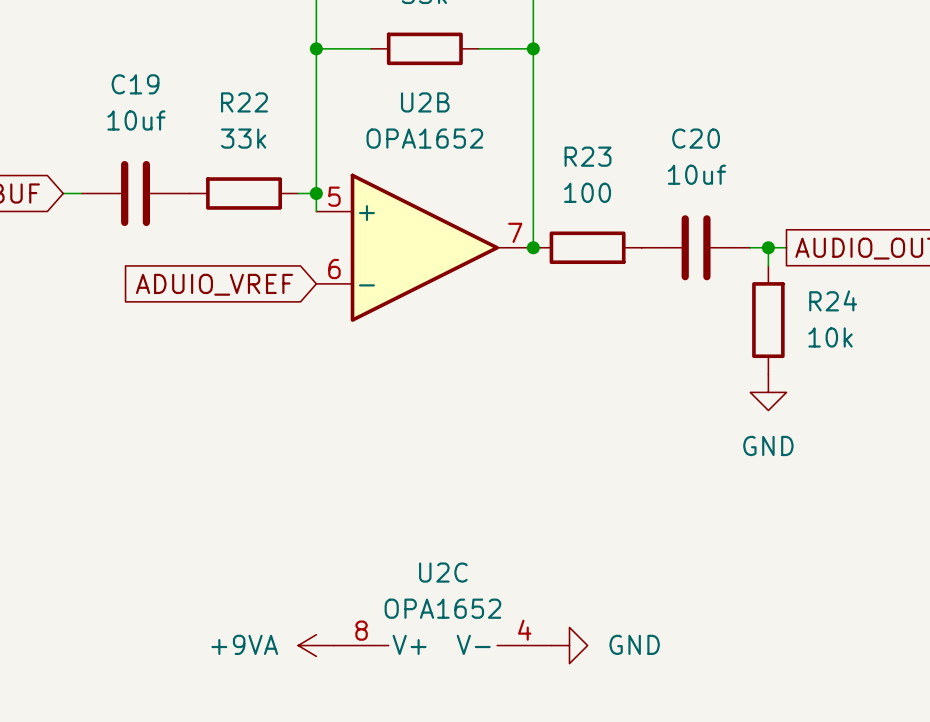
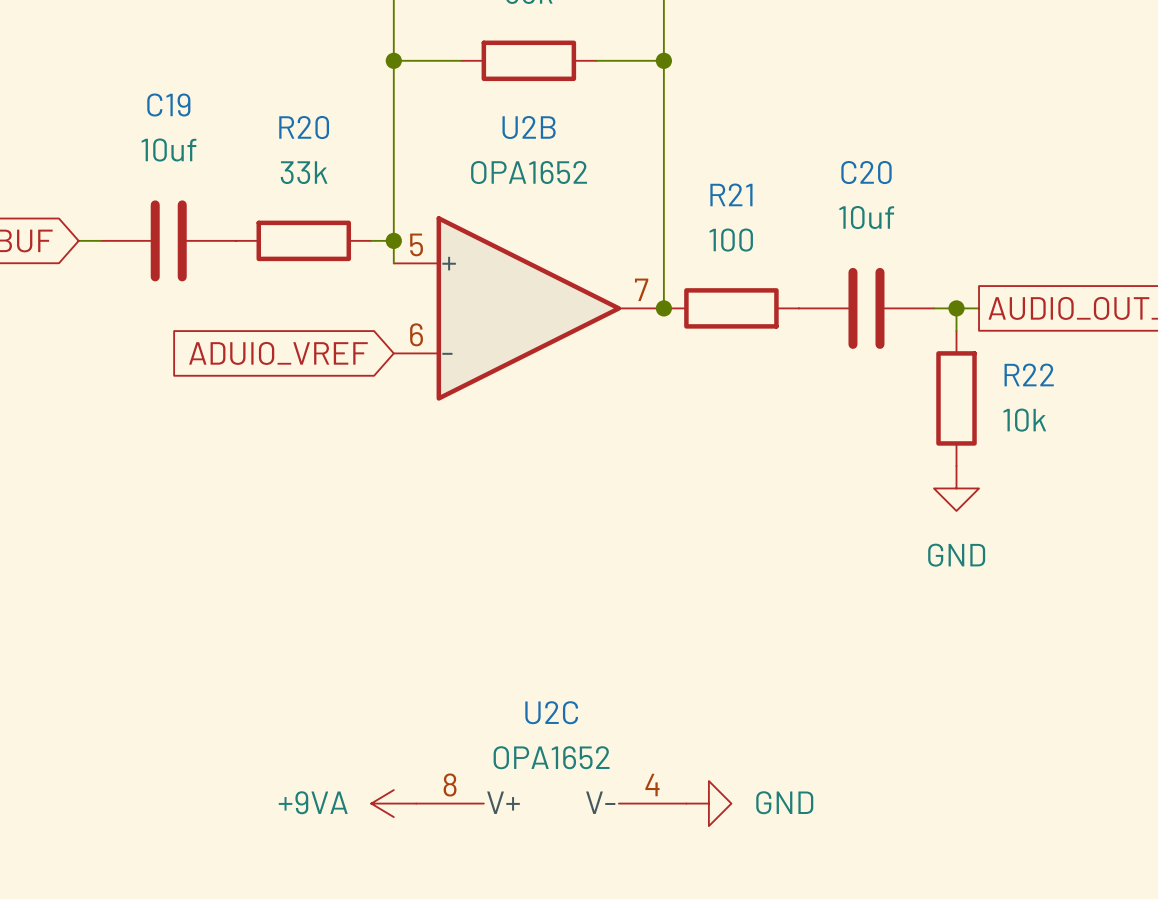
R22 name: R22 (244, 102) -> R20 (304, 127)
R23 name: R23 (588, 156) -> R21 (731, 194)
R24 name: R24 (833, 300) -> R22 (1029, 374)

